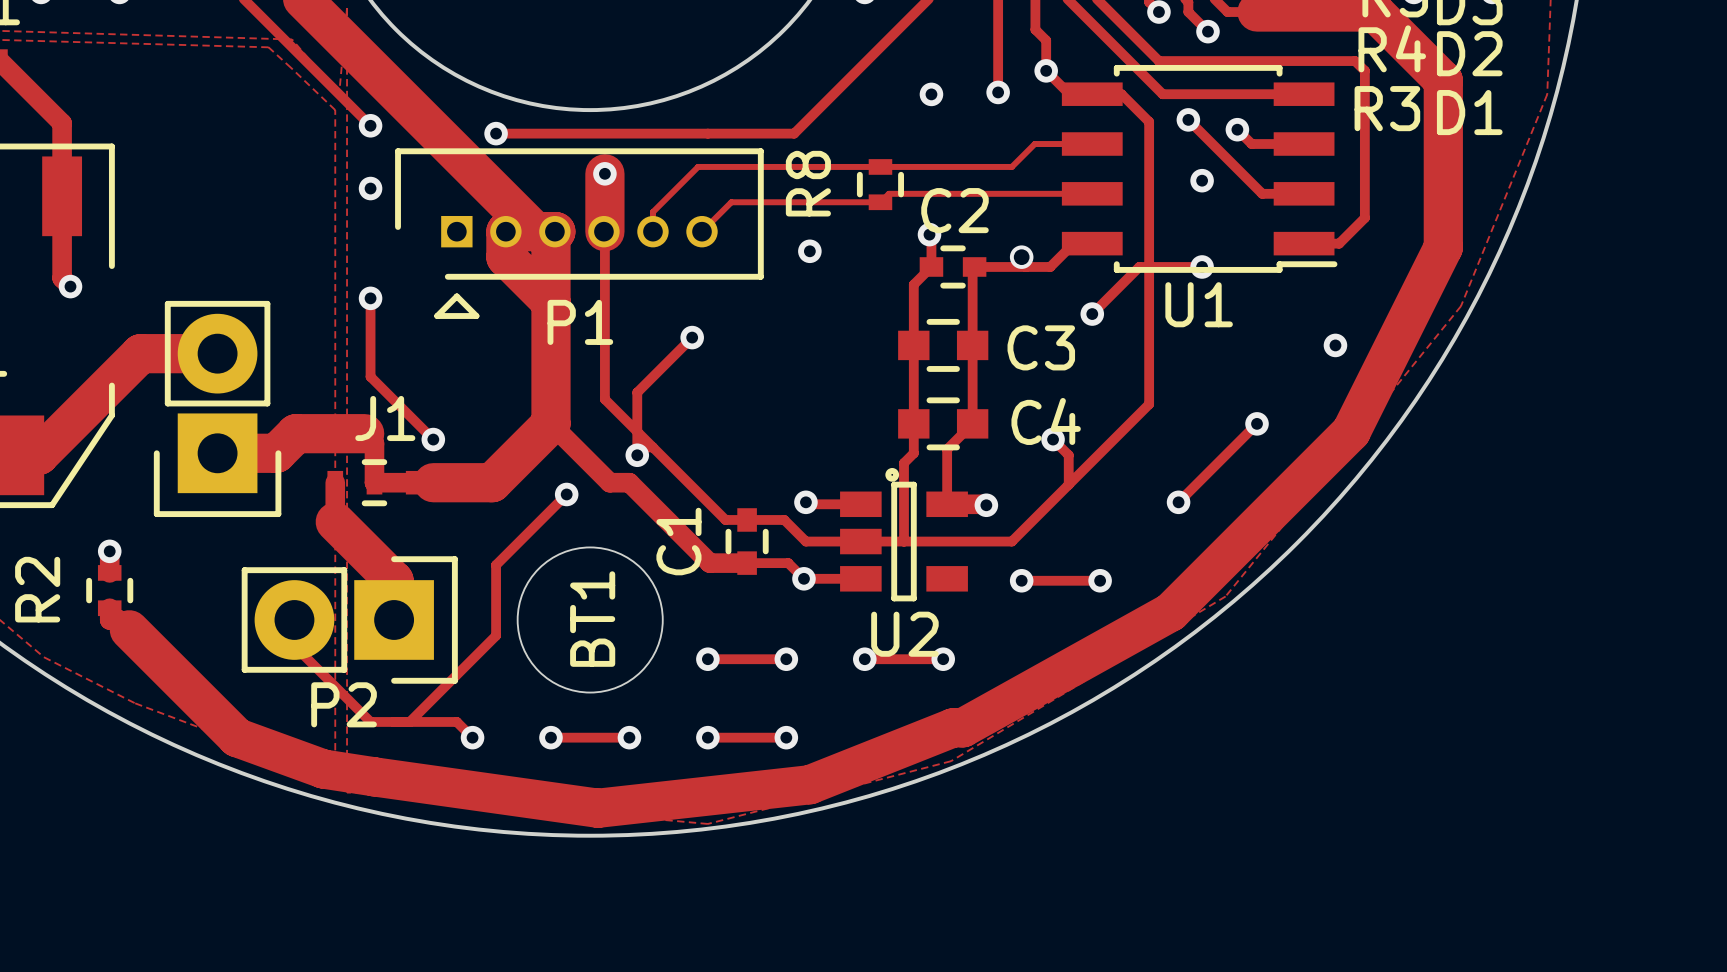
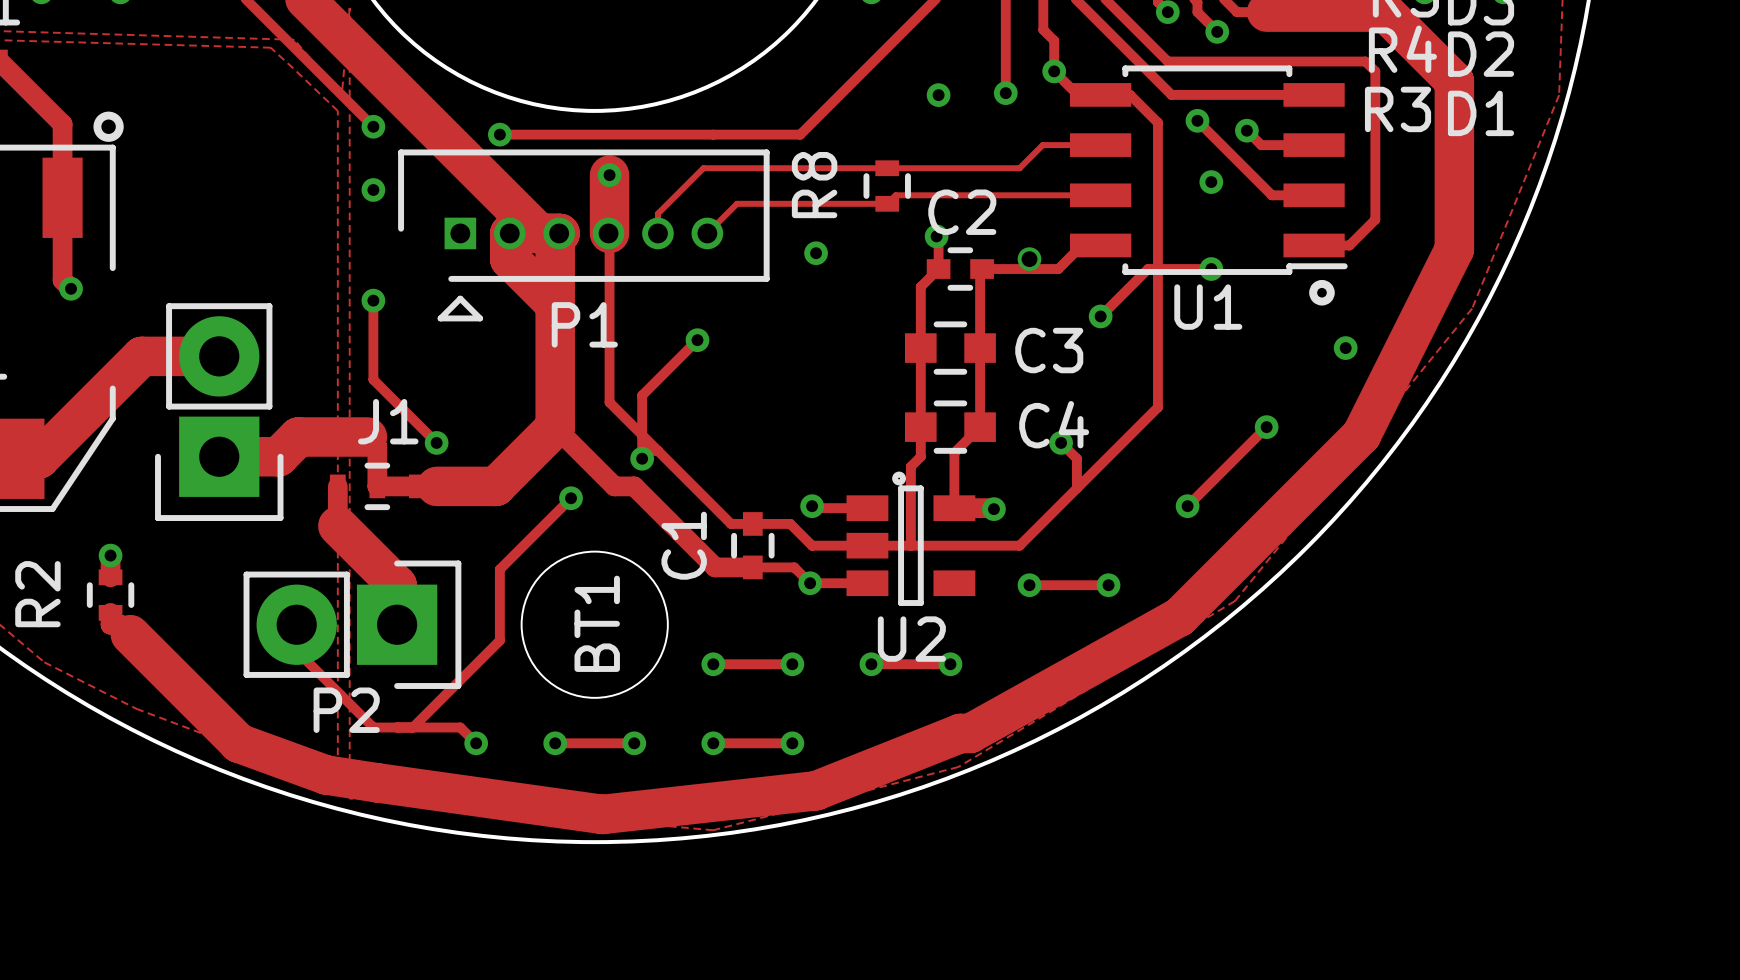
drawing: none -> [93, 111, 124, 142]
drawing: none -> [1309, 279, 1335, 306]

